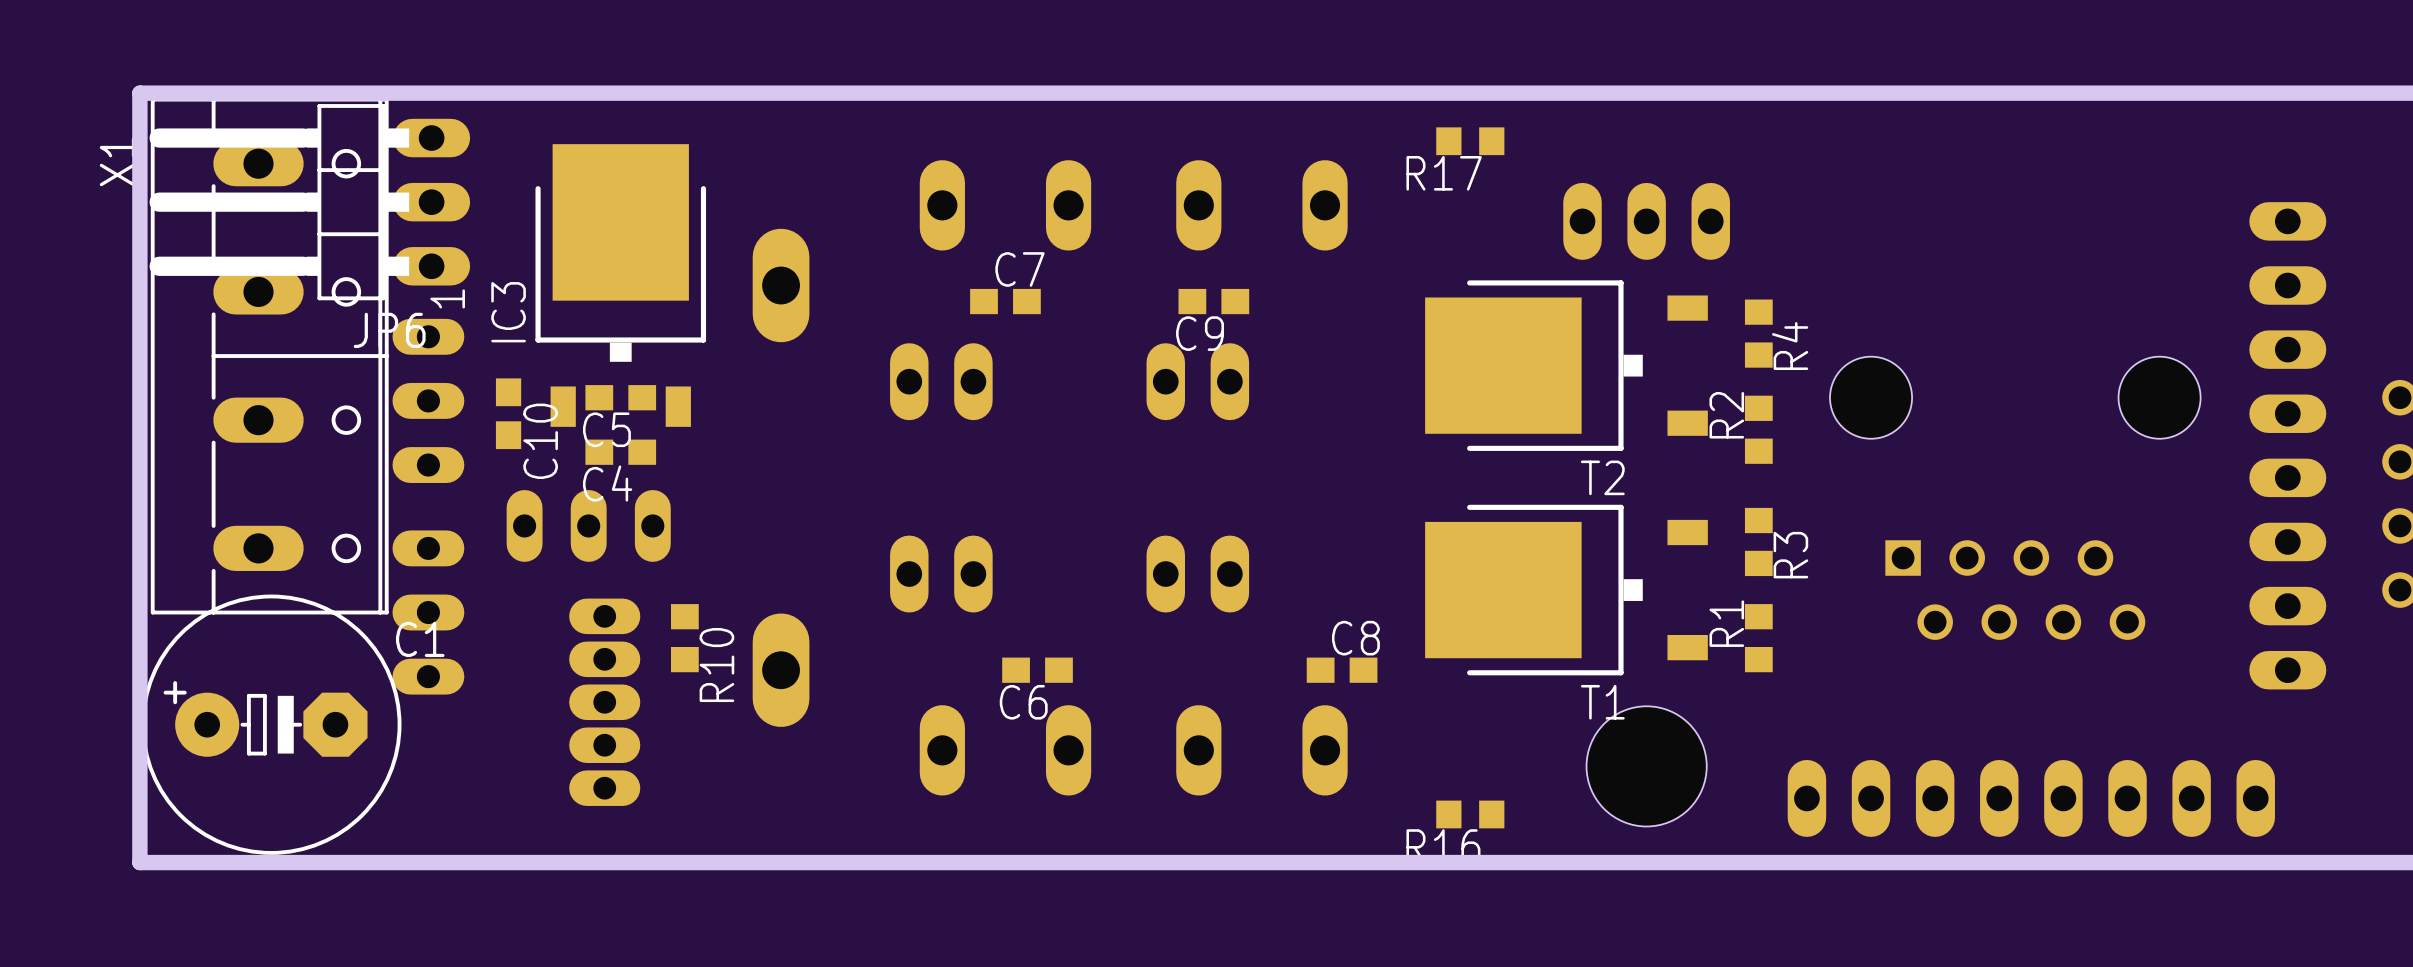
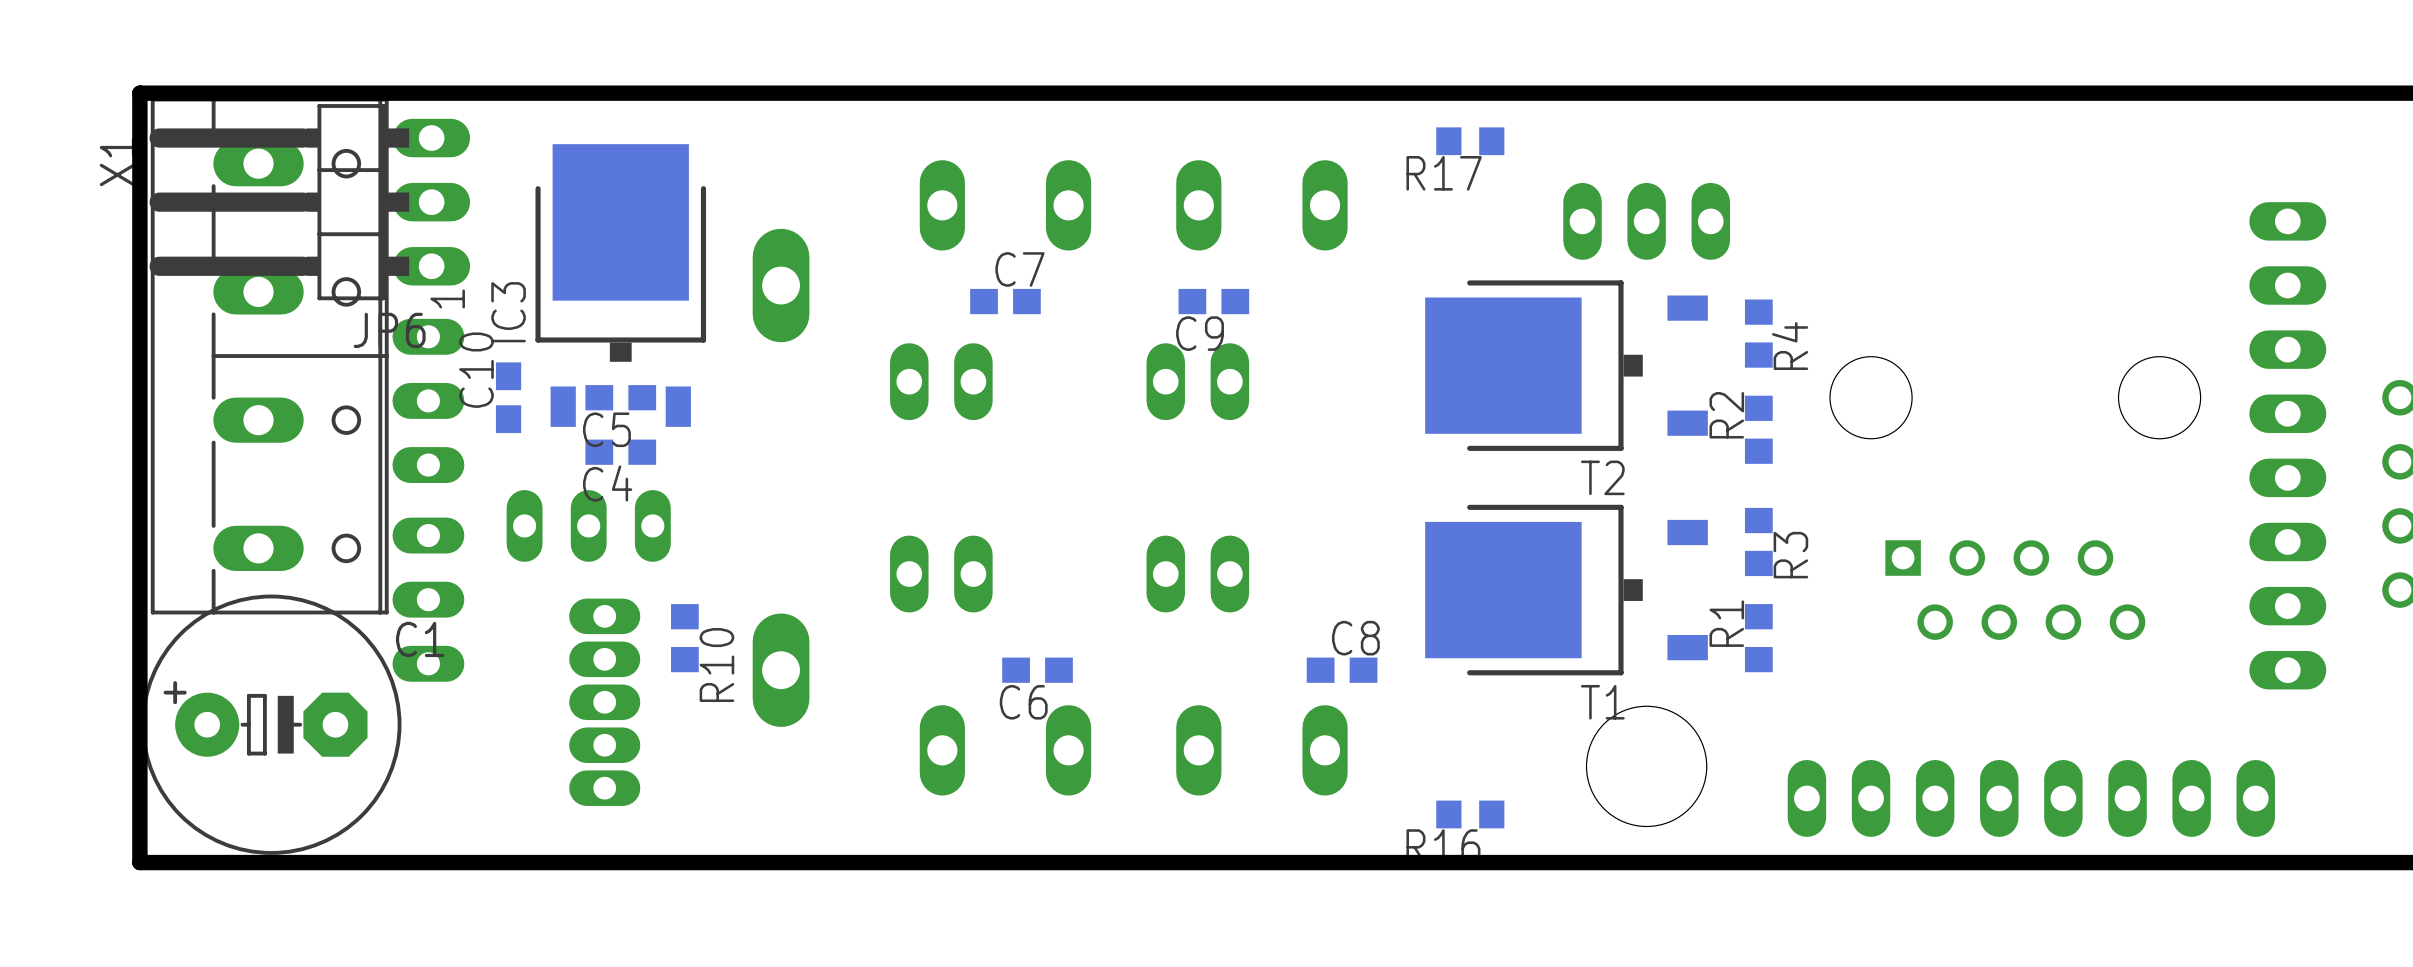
C10 position: (508, 413) -> (508, 397)
C10 name position: C10 (540, 441) -> C10 (476, 370)
part position: (428, 612) -> (428, 599)

